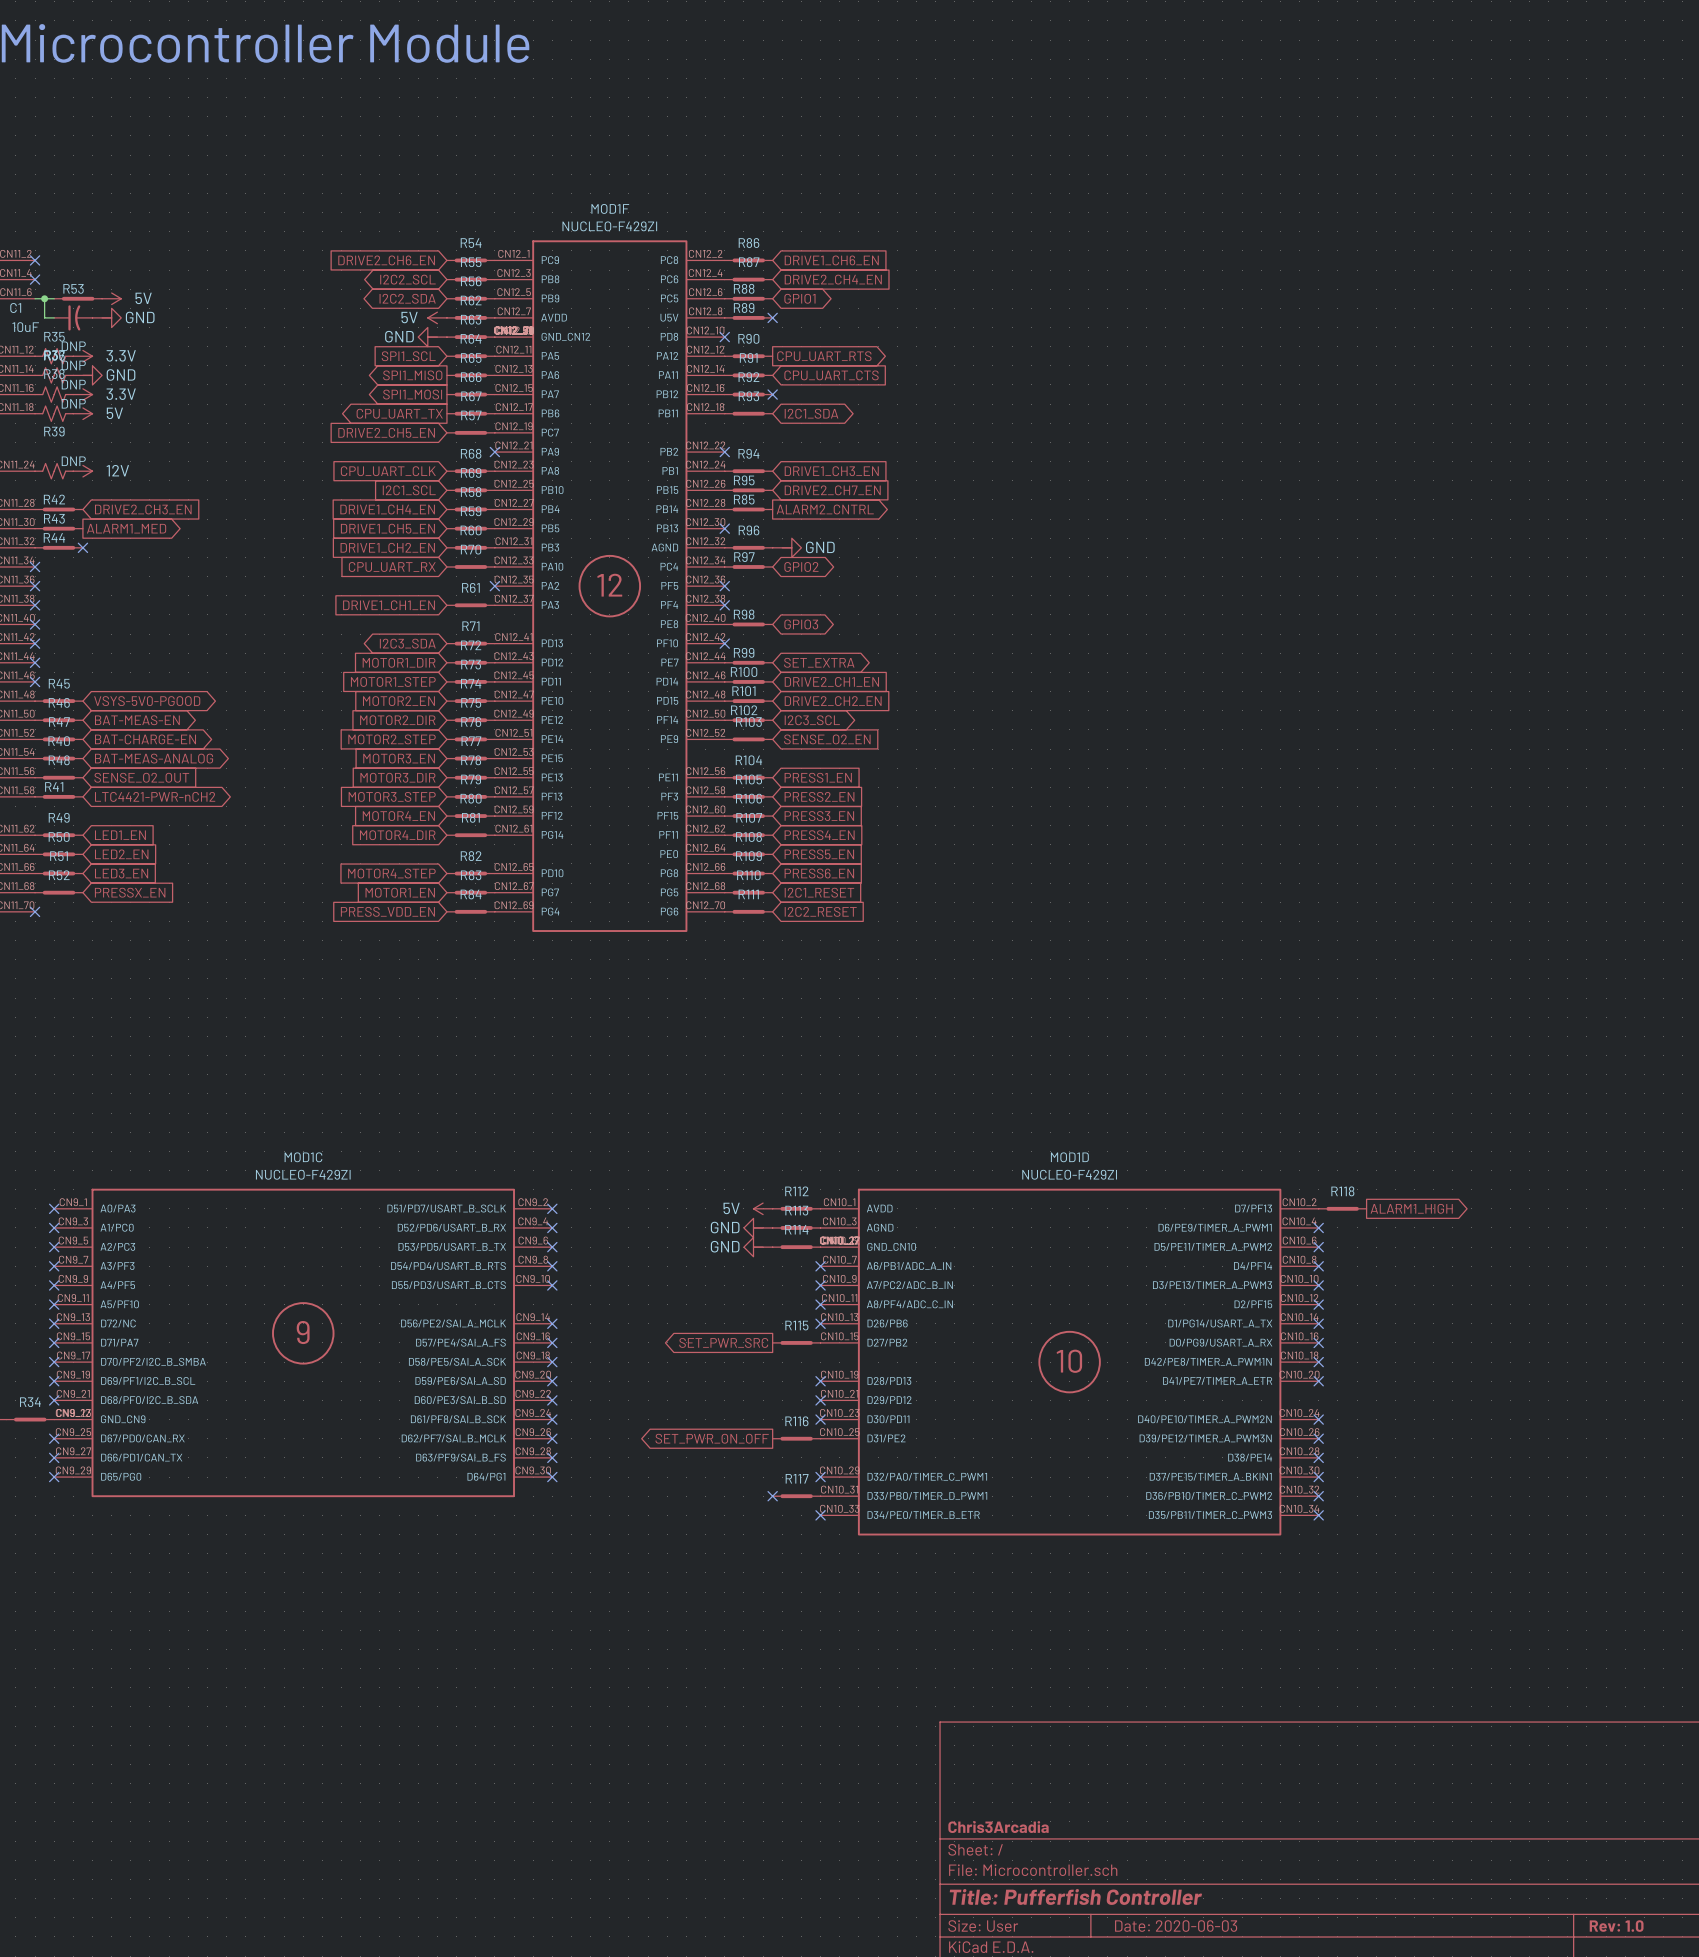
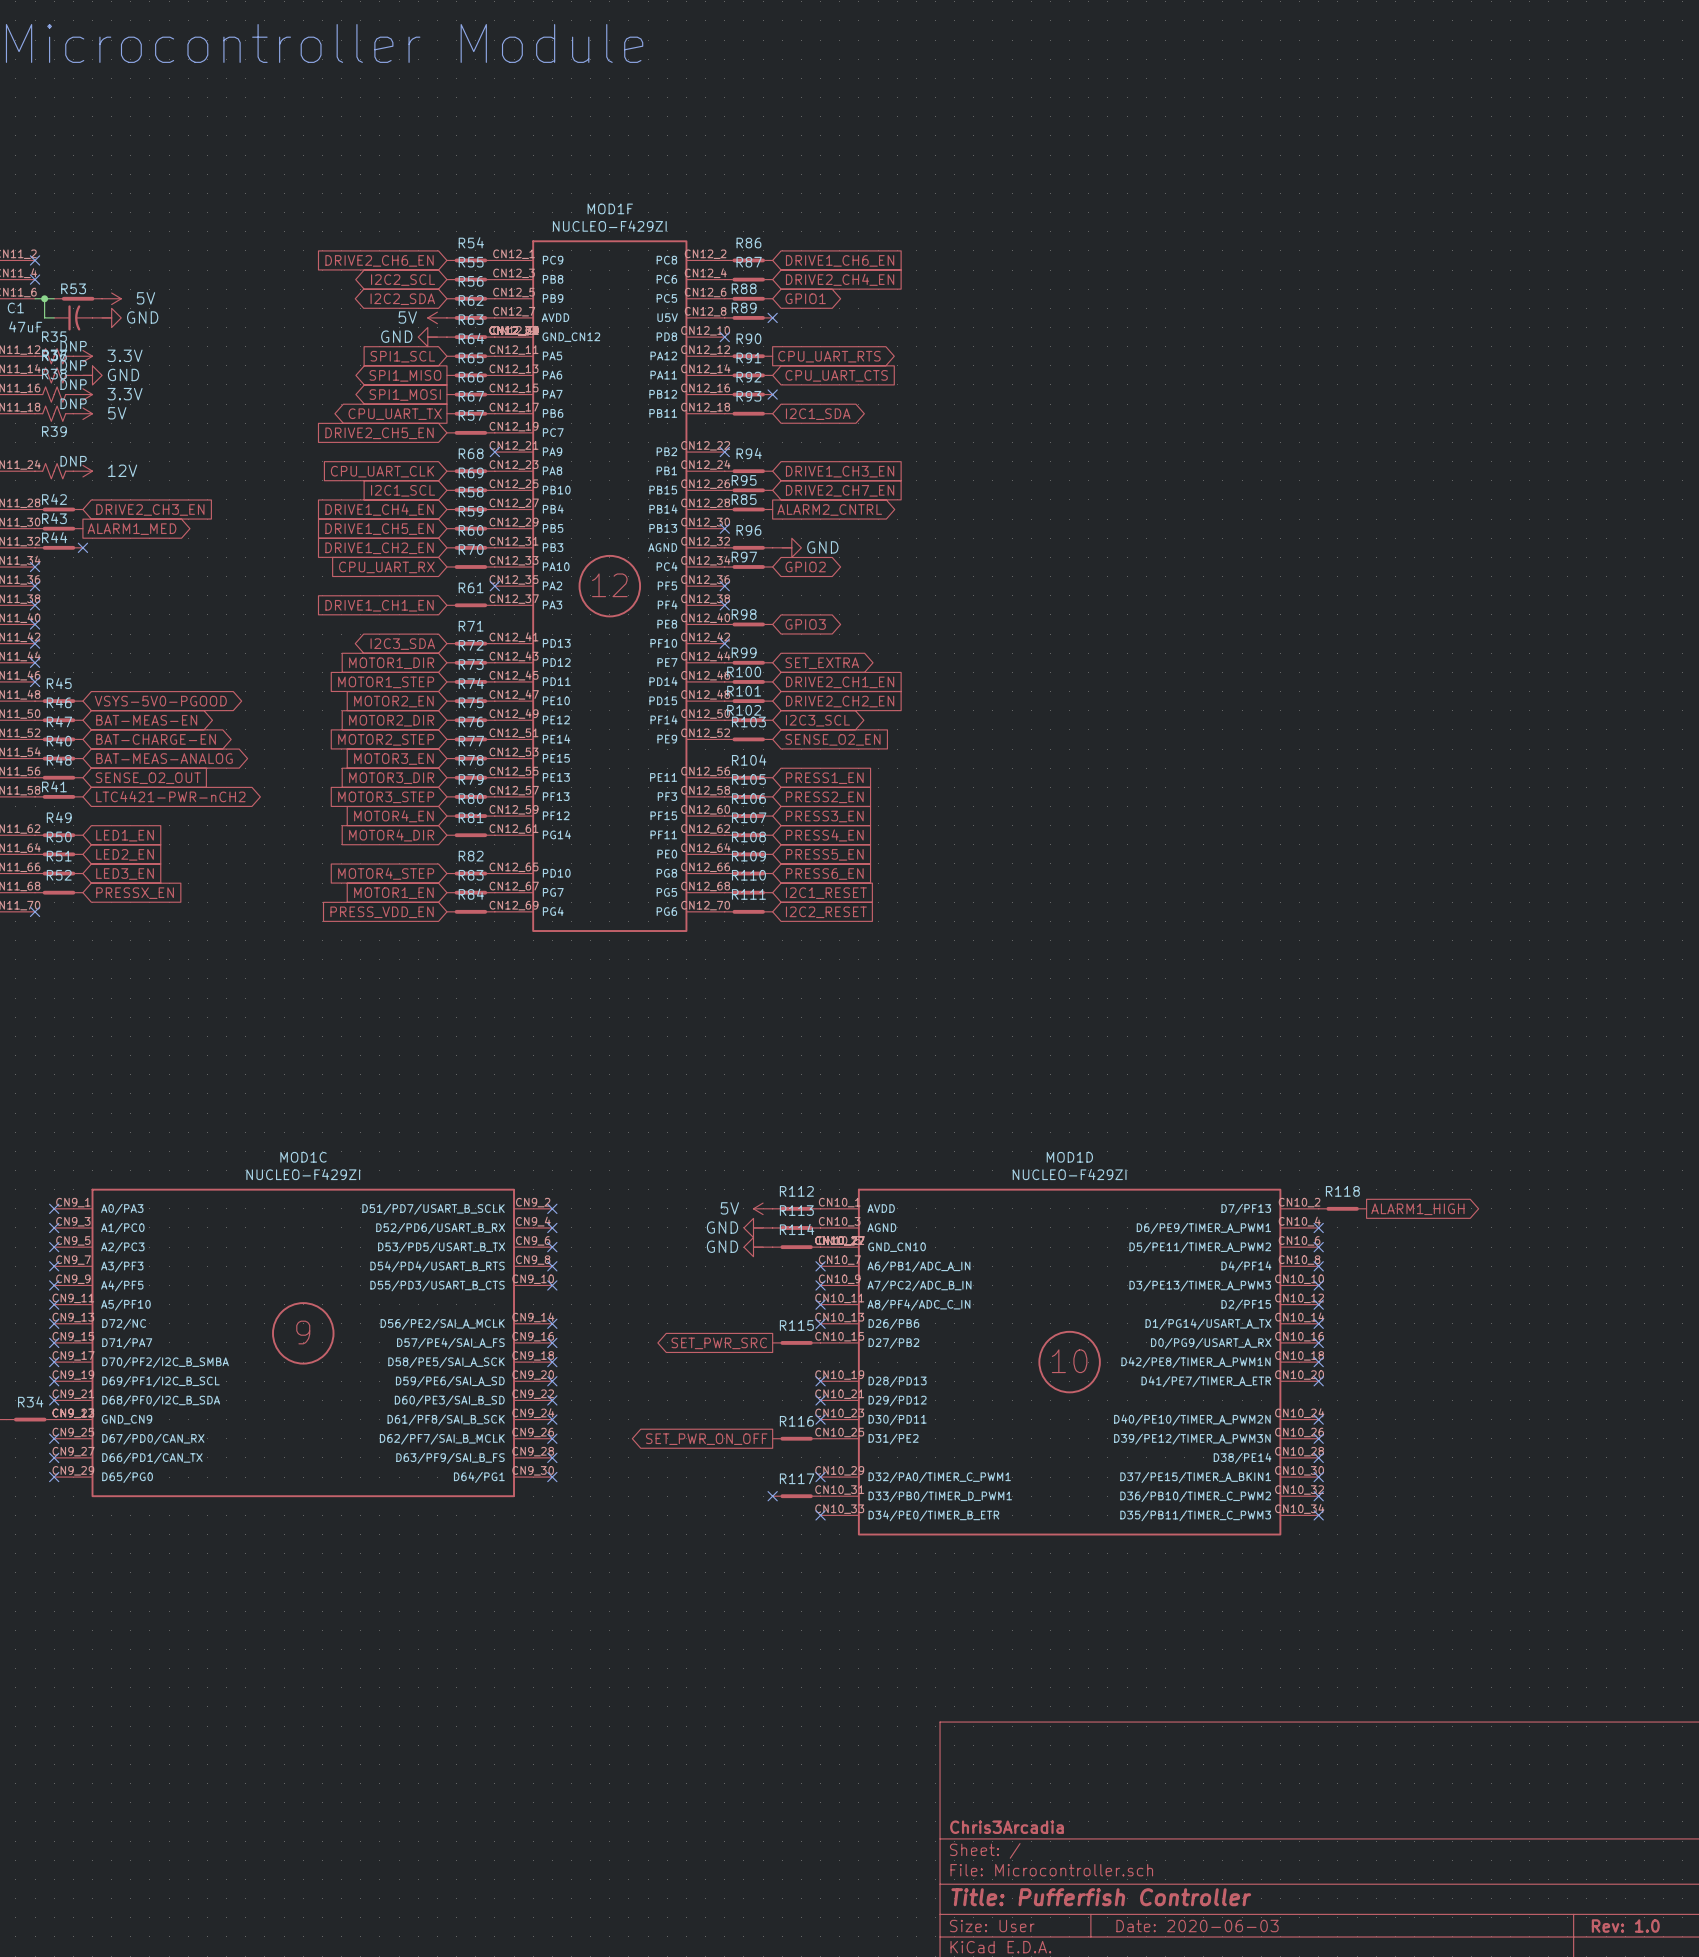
C1 text: 10uF (25, 327) -> 47uF (25, 326)

